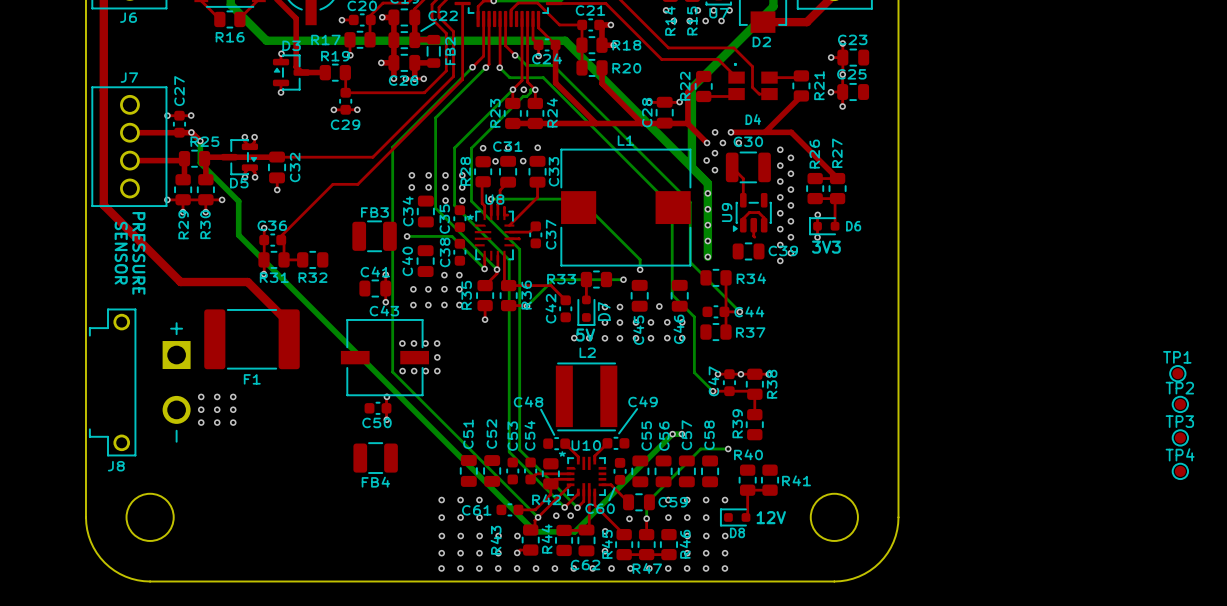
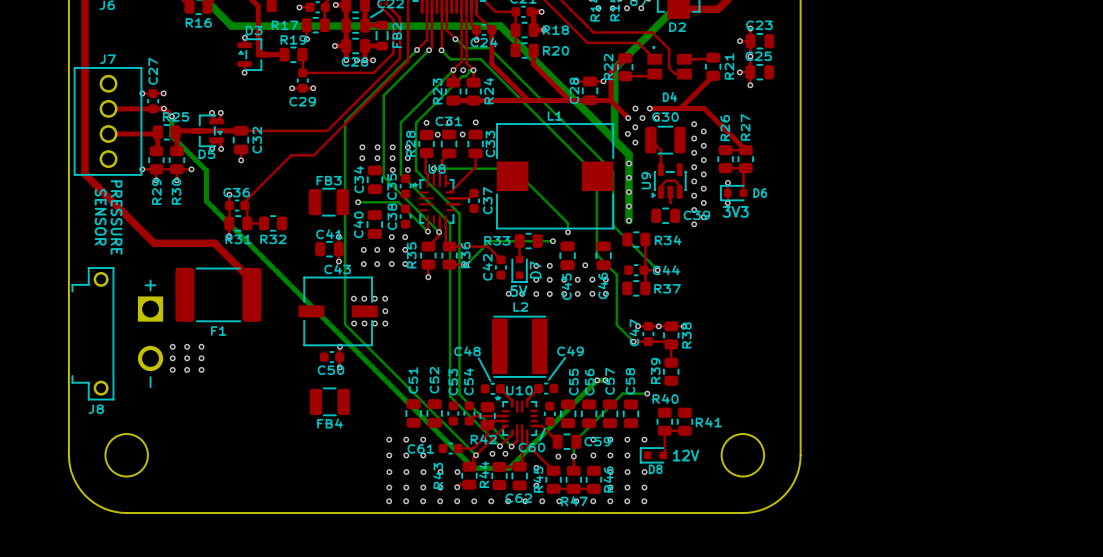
TP1: (1177, 373) -> none
TP2: (1180, 404) -> none
TP3: (1180, 437) -> none
TP4: (1180, 471) -> none

